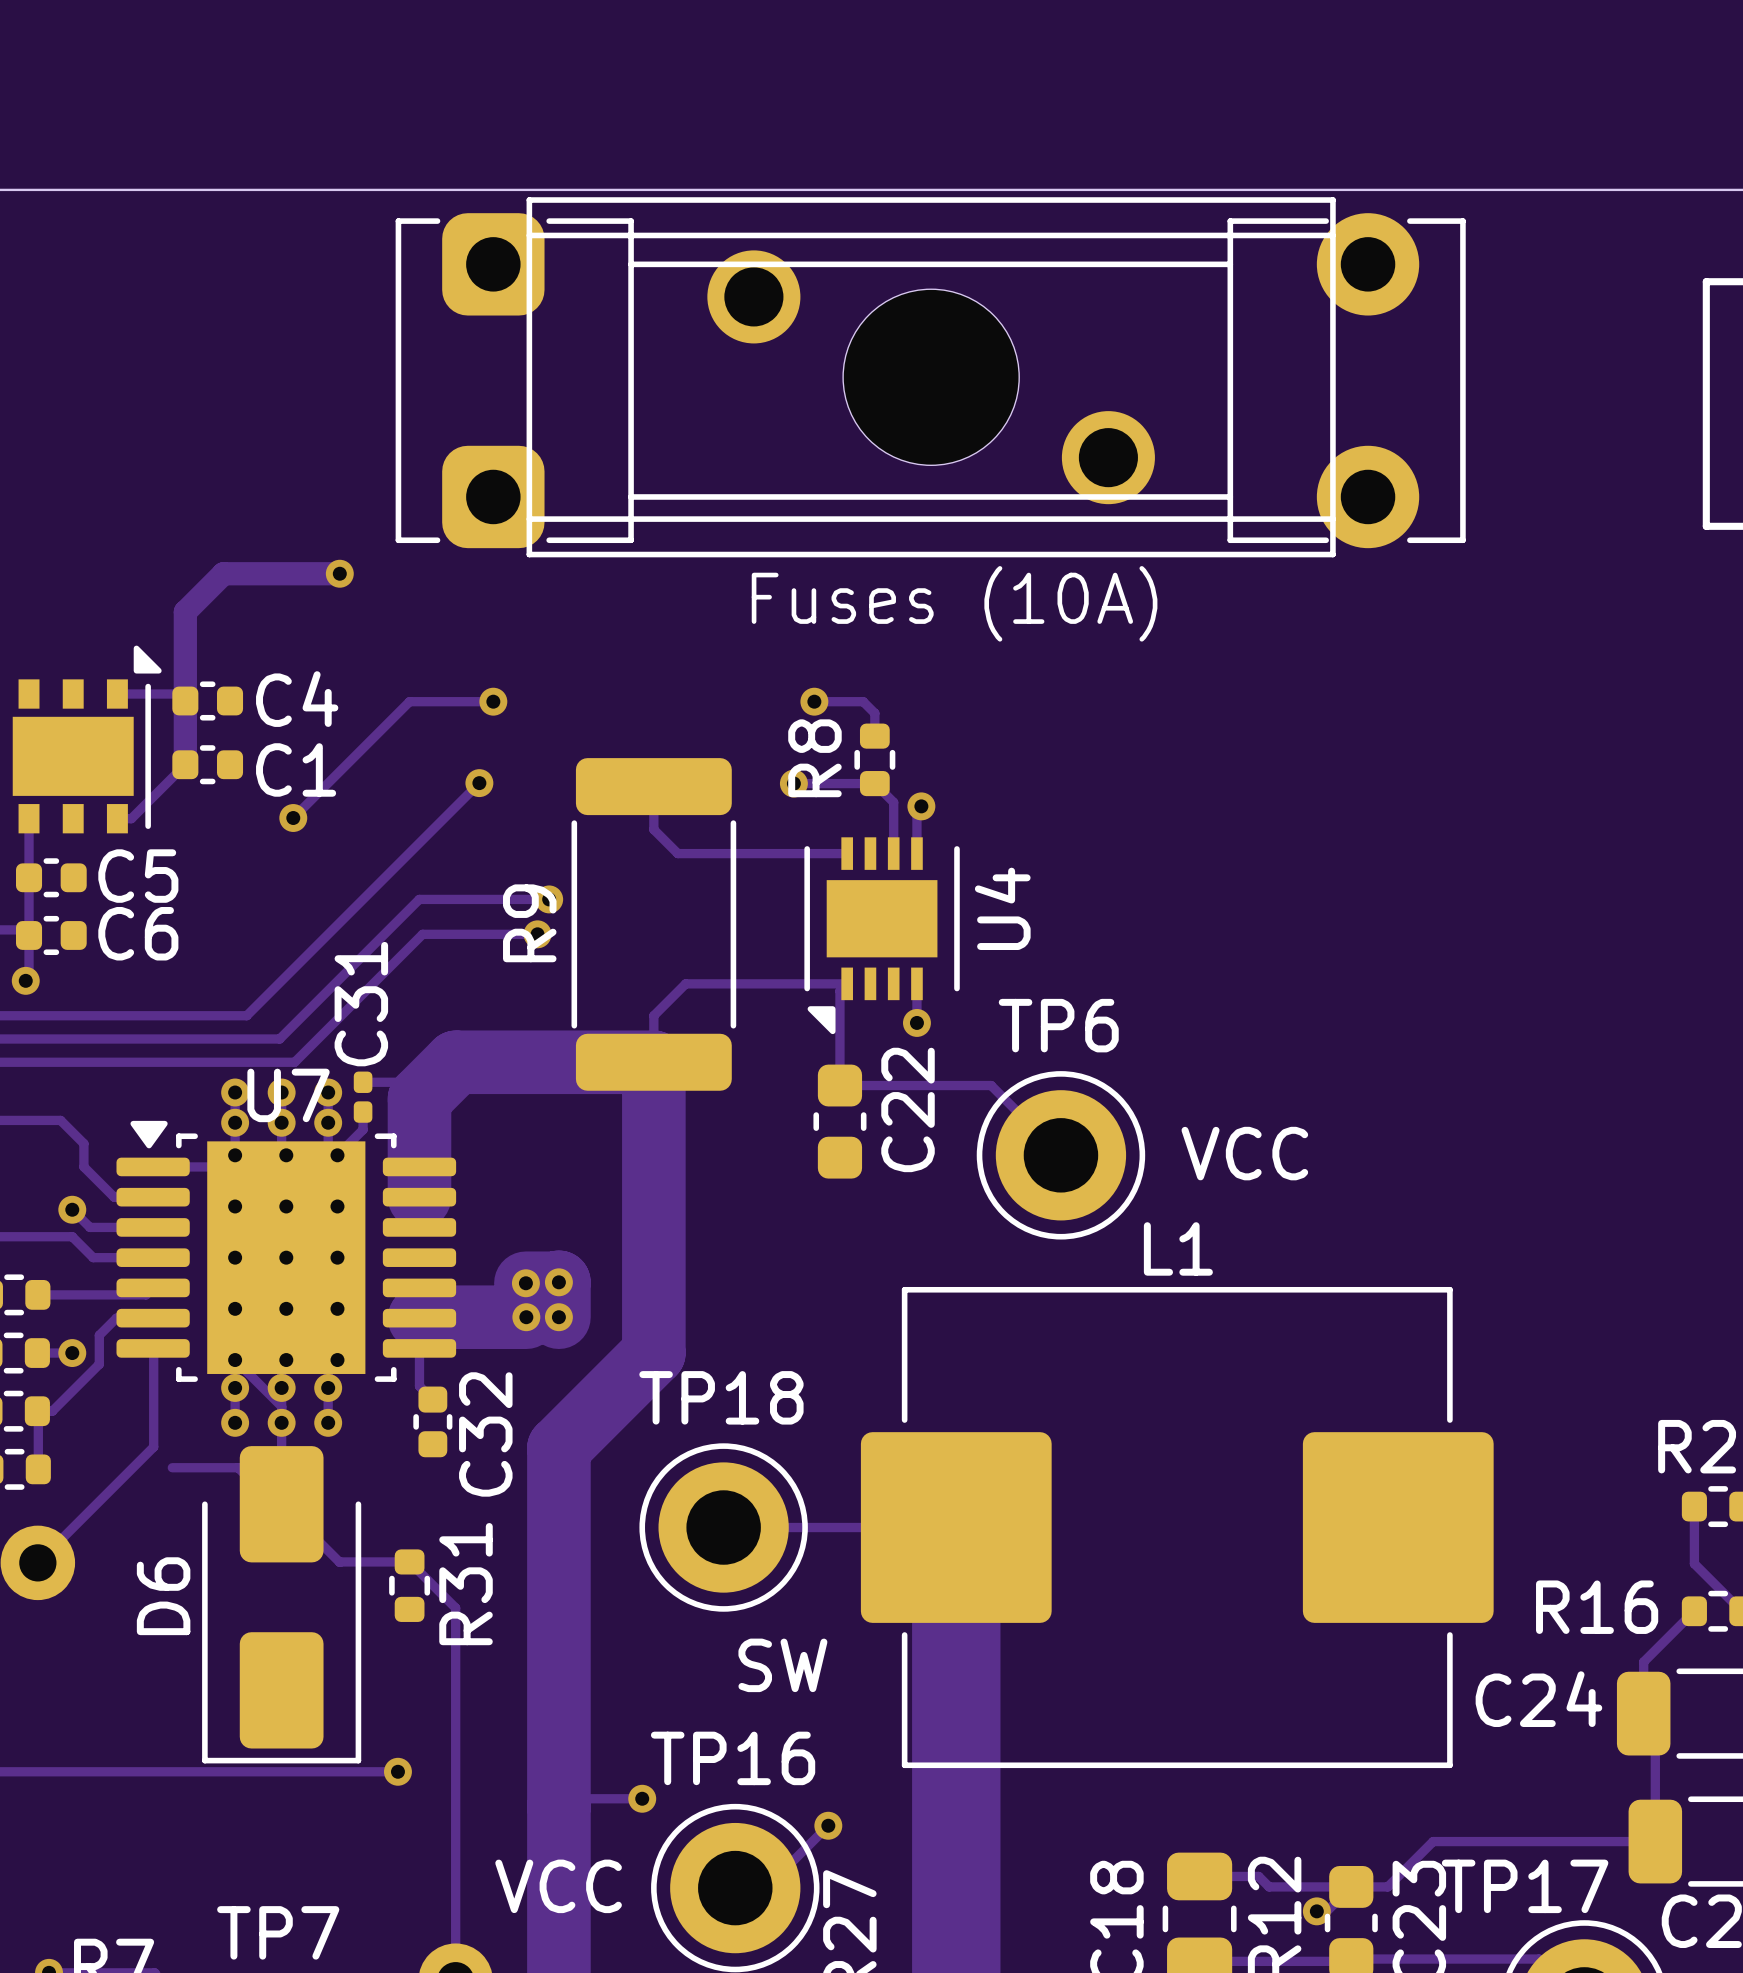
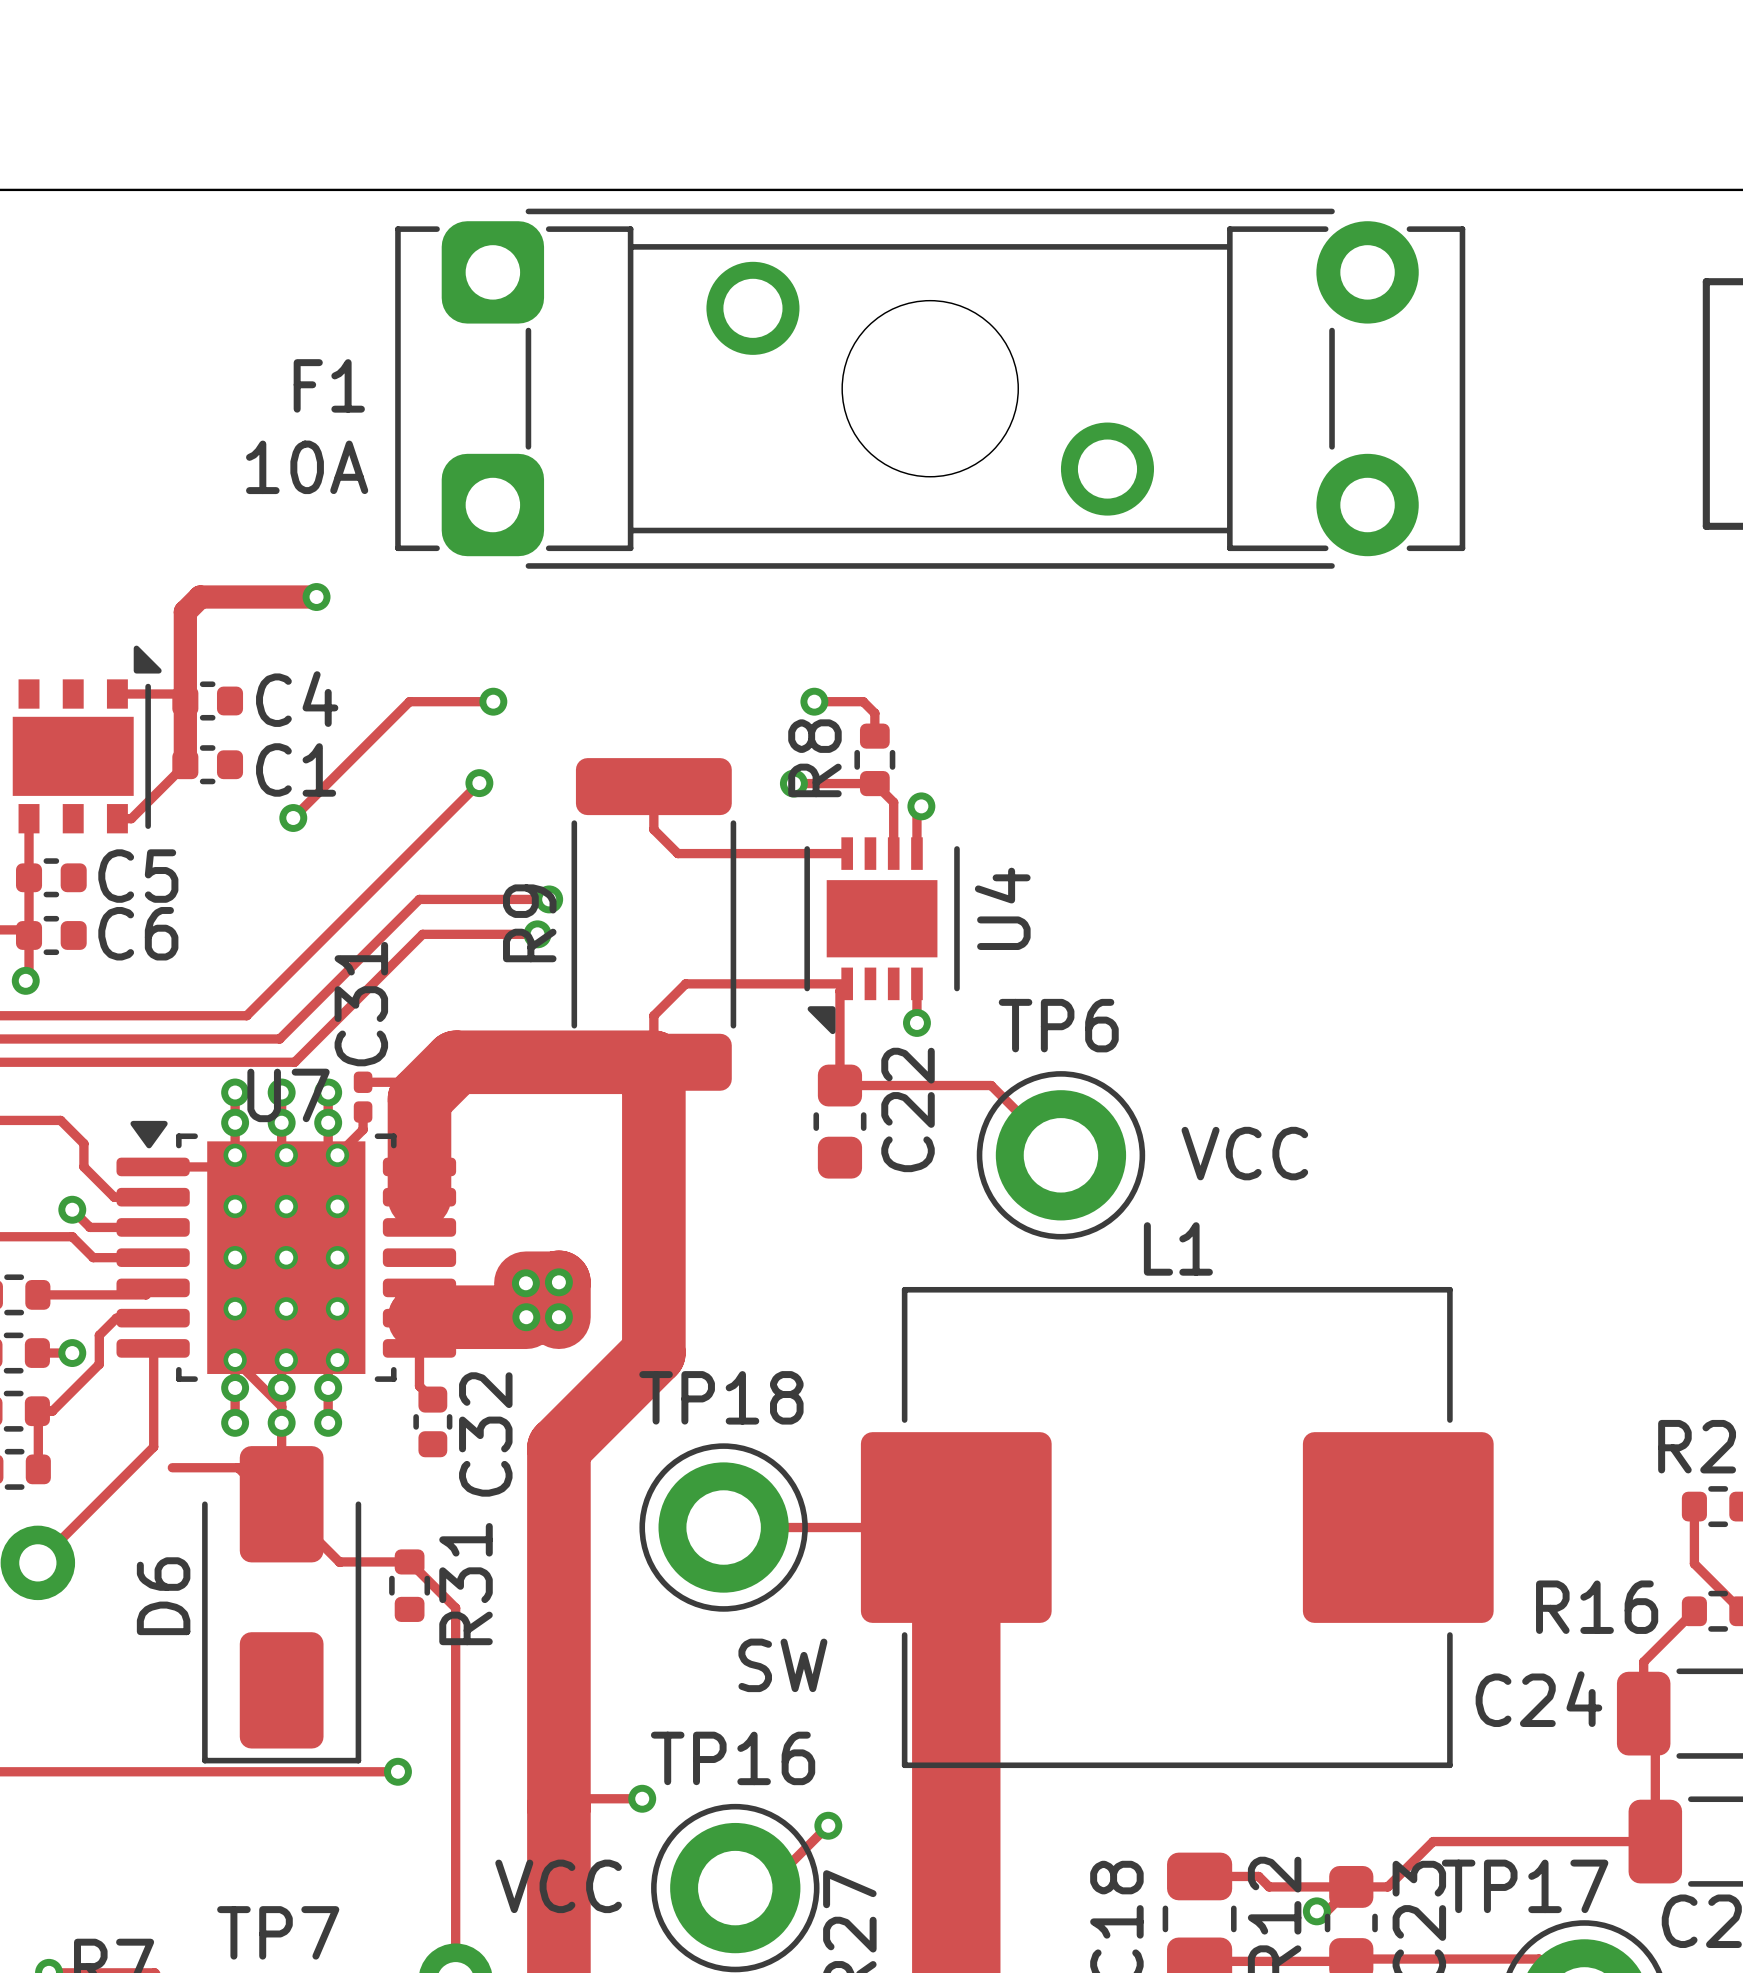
part: (931, 377) -> none
part: (930, 380) -> none
F1: none -> 10A (930, 388)
track: (339, 573) (223, 573) (200, 597) -> (316, 597) (200, 597)
via position: (339, 573) -> (316, 597)
text: Fuses (10A) (954, 603) -> none

